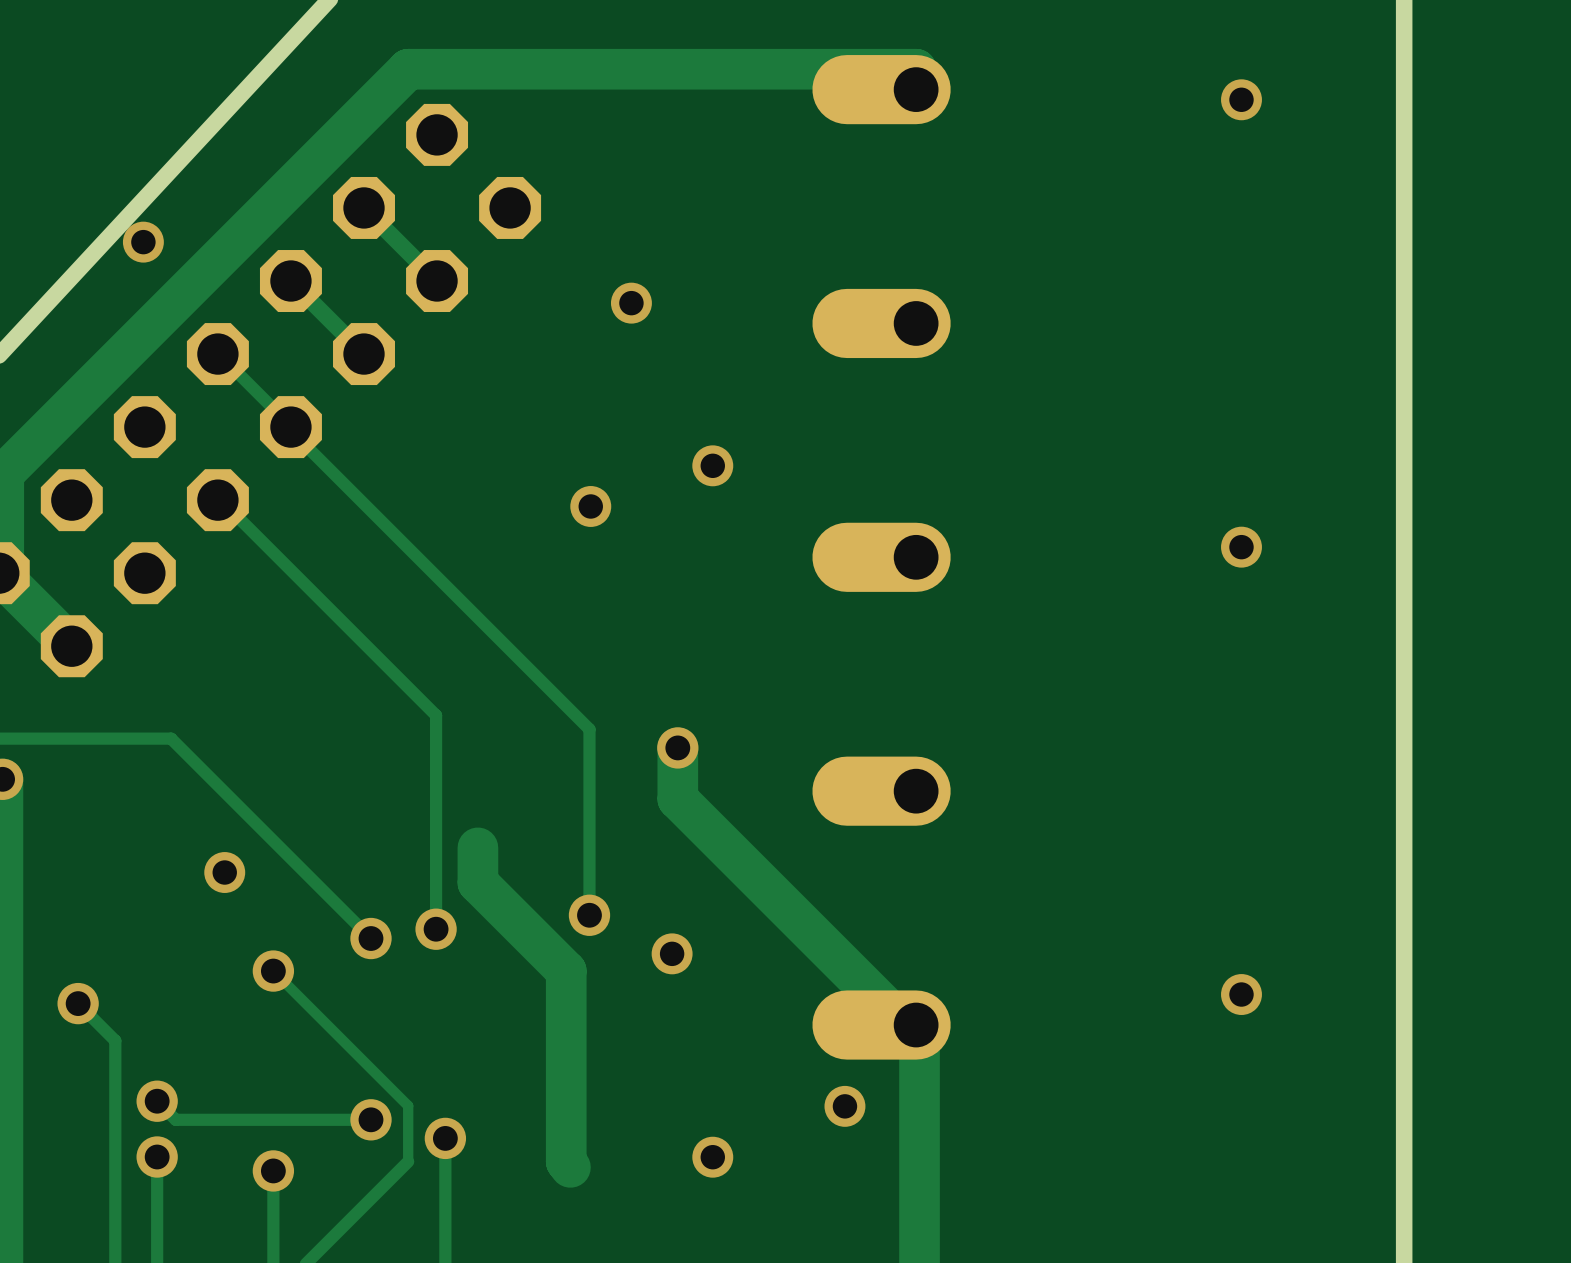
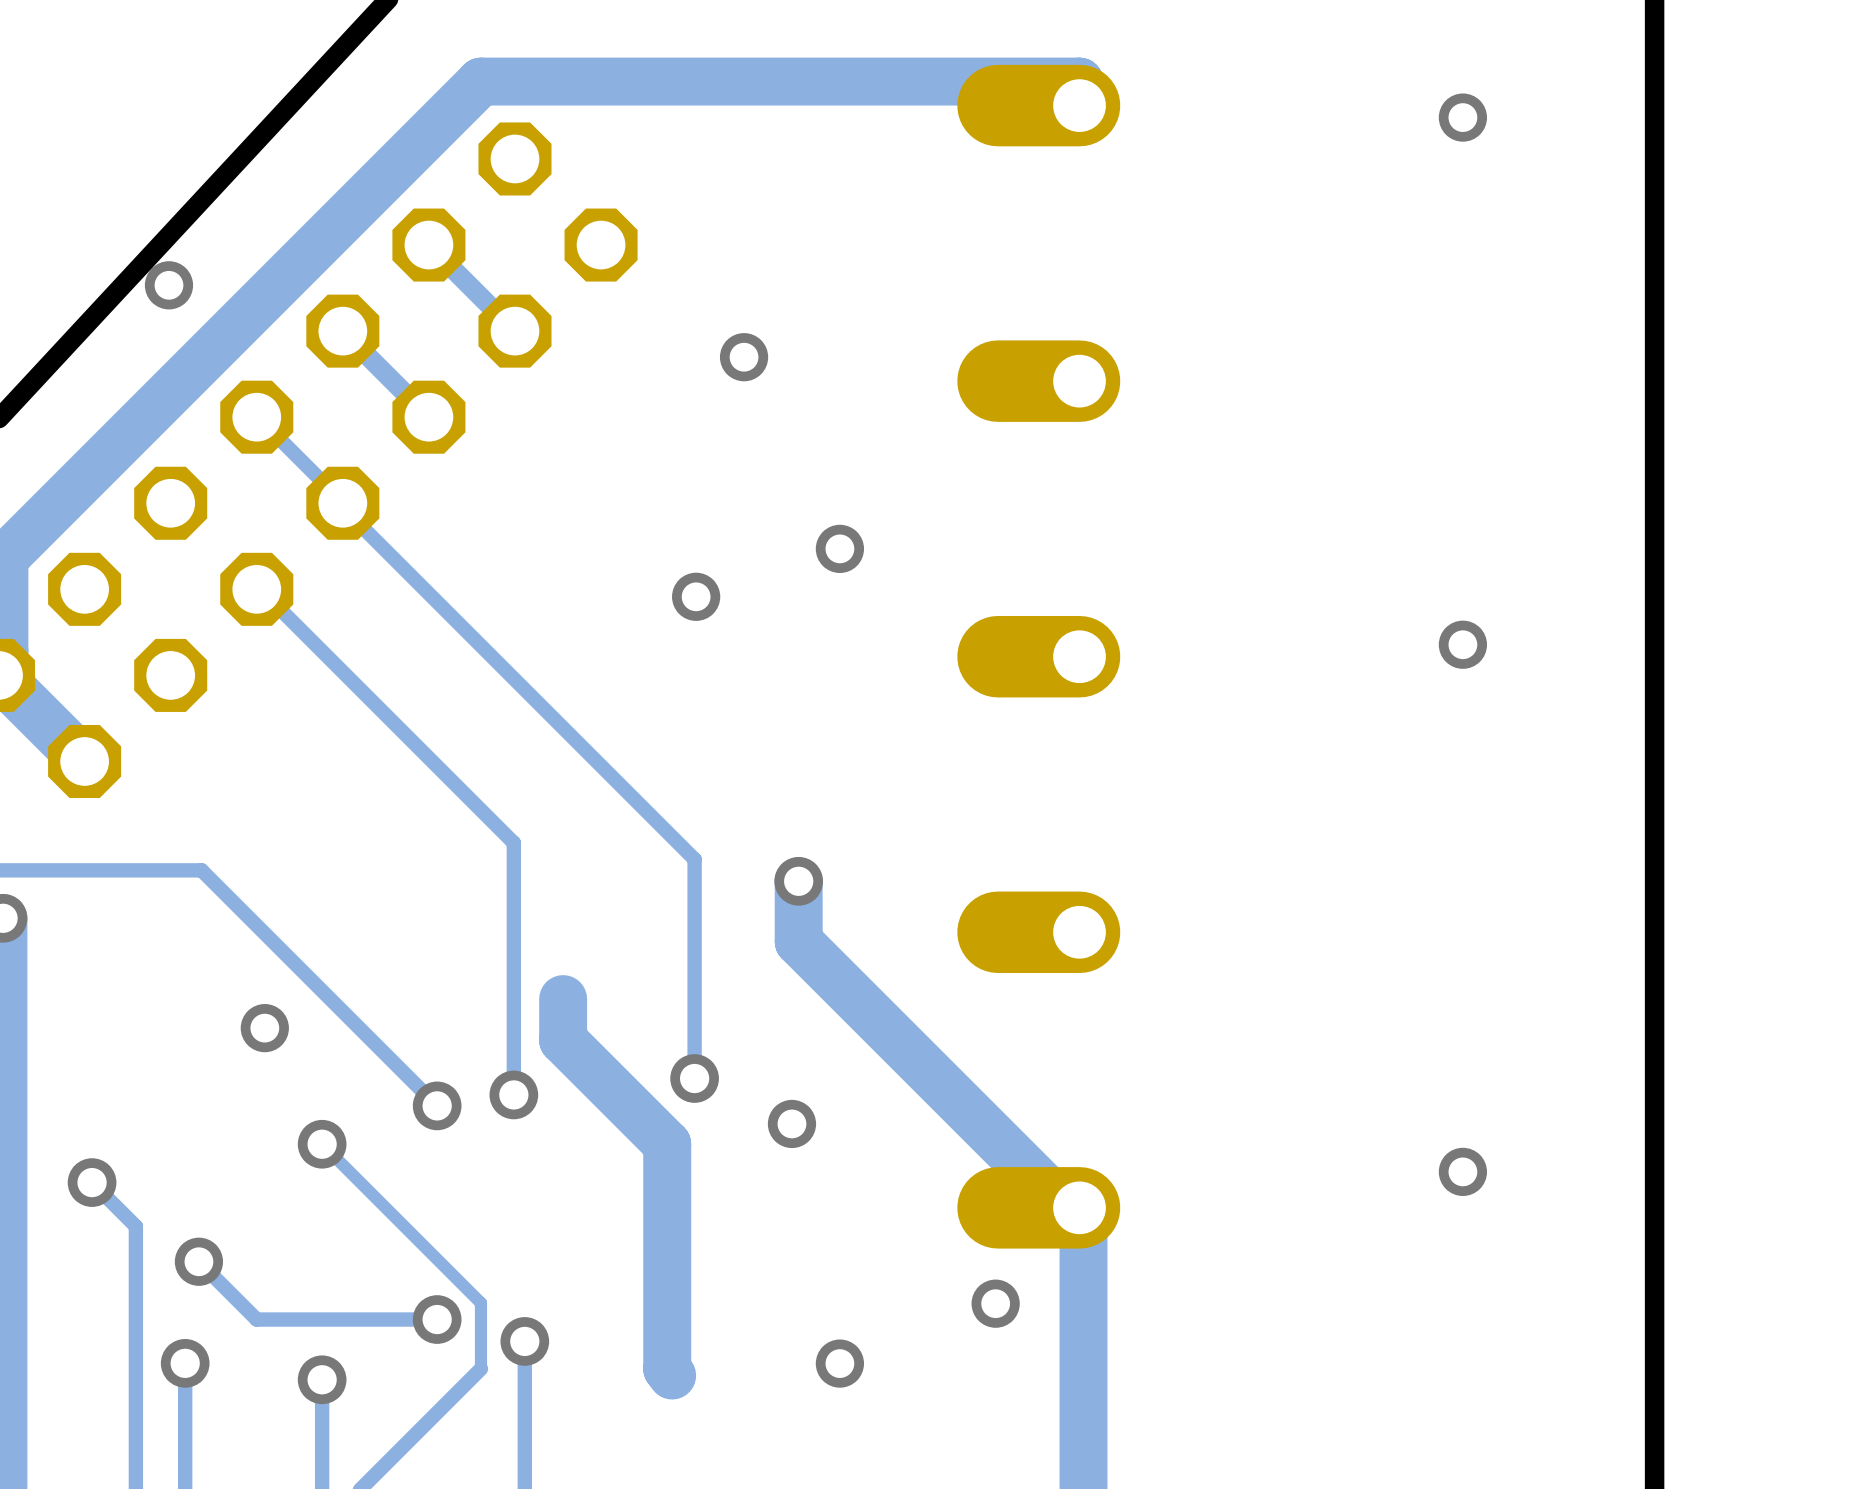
track: (157, 1101) (175, 1119) (217, 1119) -> (198, 1261) (256, 1319)
via position: (157, 1101) -> (198, 1261)

